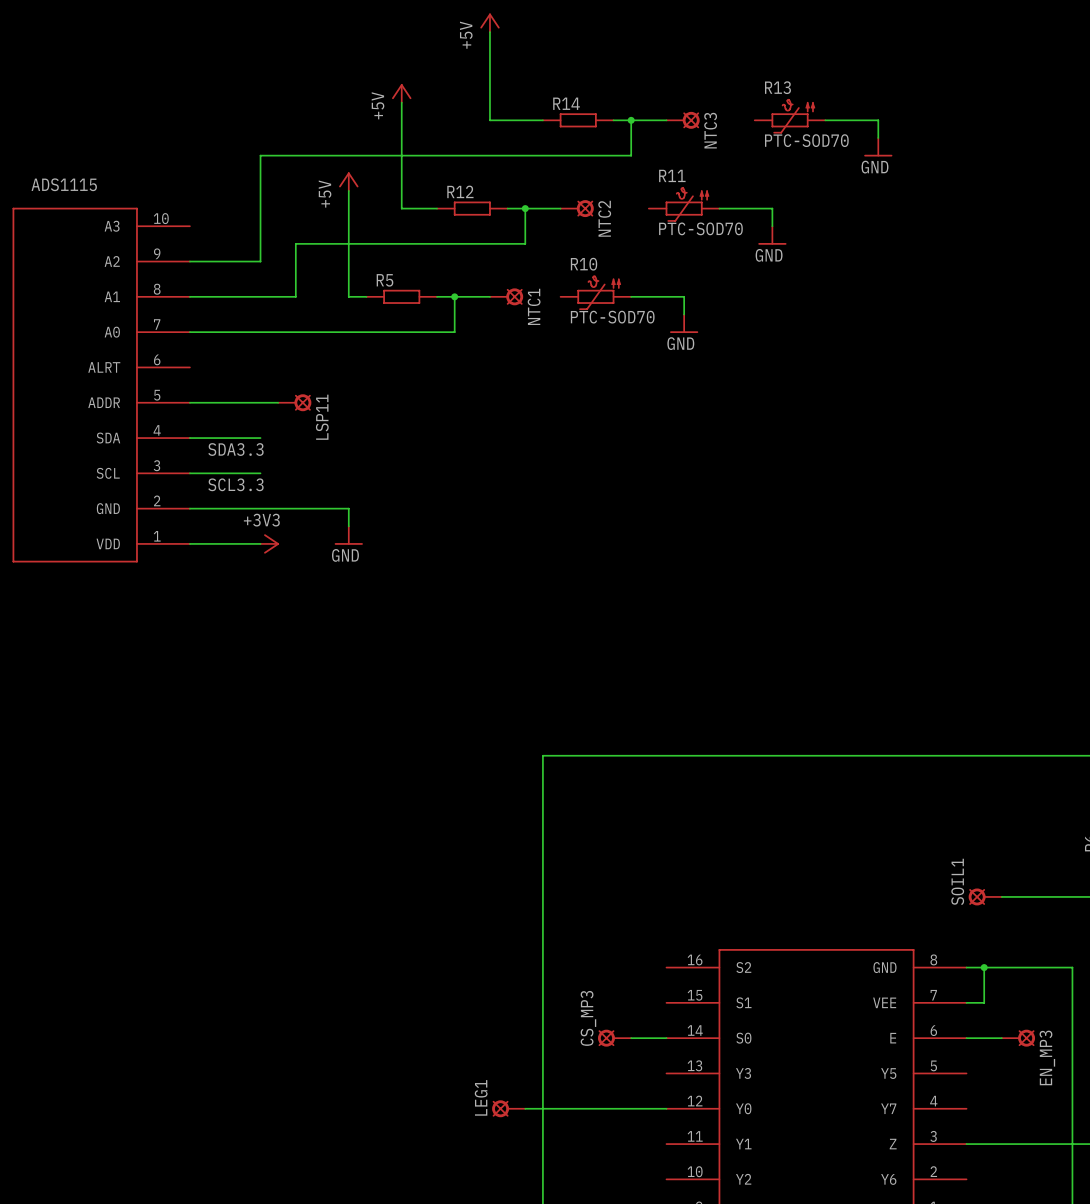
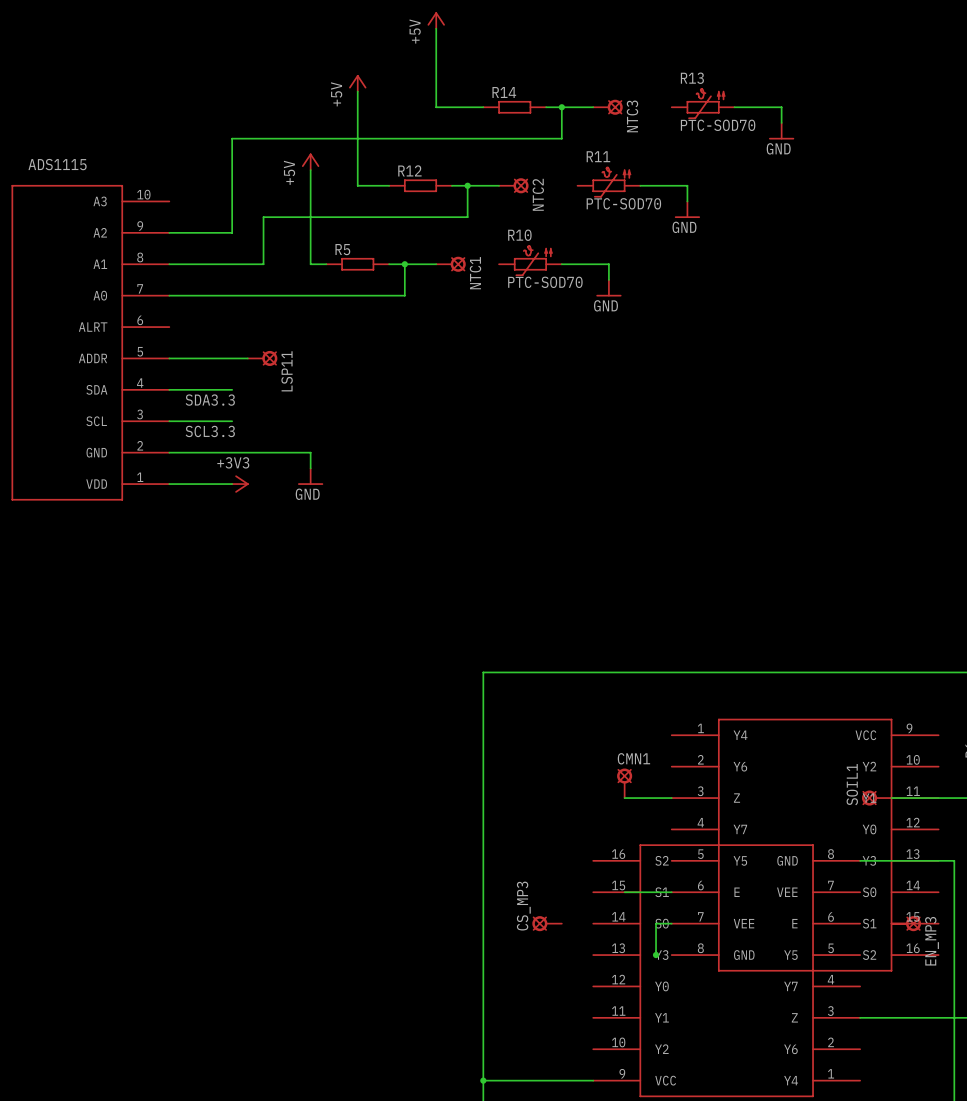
CMN1: none -> (624, 783)
wire: none -> (624, 798) (671, 798)
part: none -> (805, 845)
wire: (984, 967) (984, 1002) (966, 1002) -> none
junction: (984, 967) -> none
wire: none -> (624, 892) (671, 892)
wire: (631, 1038) (666, 1038) -> none
wire: none -> (671, 923) (656, 923) (656, 955)
wire: (966, 1038) (1001, 1038) -> none
junction: none -> (656, 955)
LEG1: (508, 1108) -> none
wire: (525, 1108) (666, 1108) -> none

